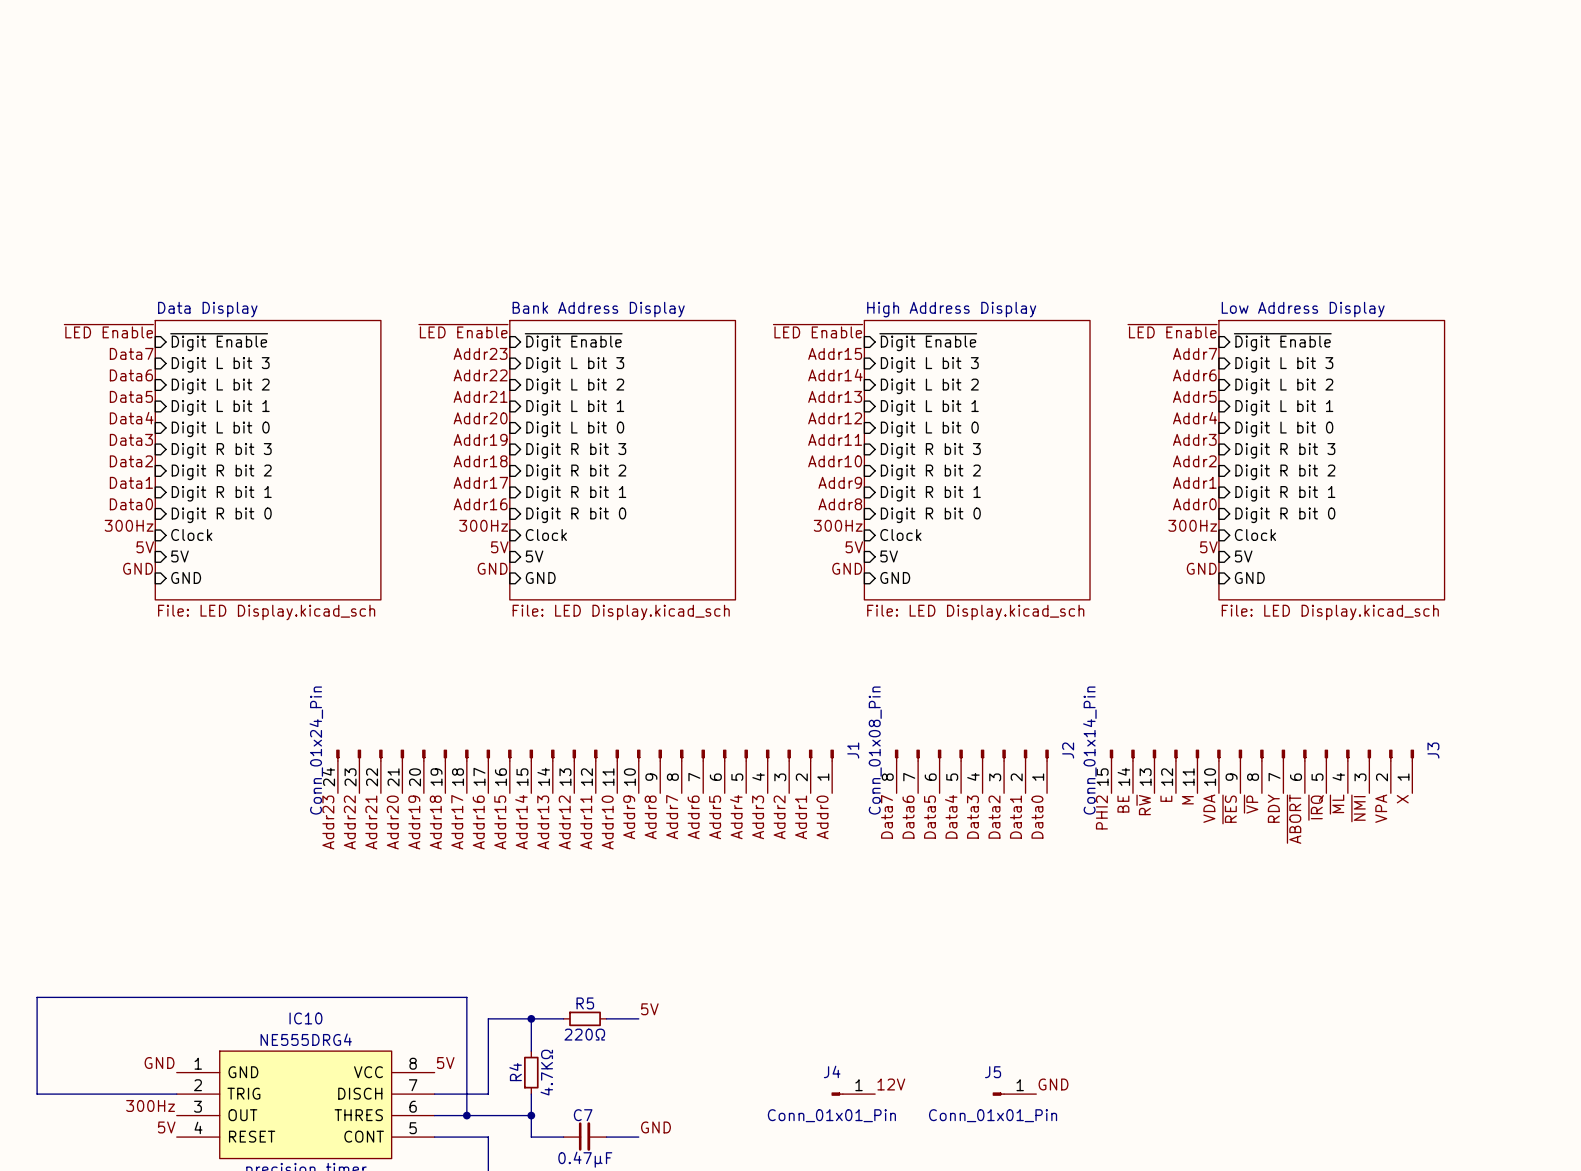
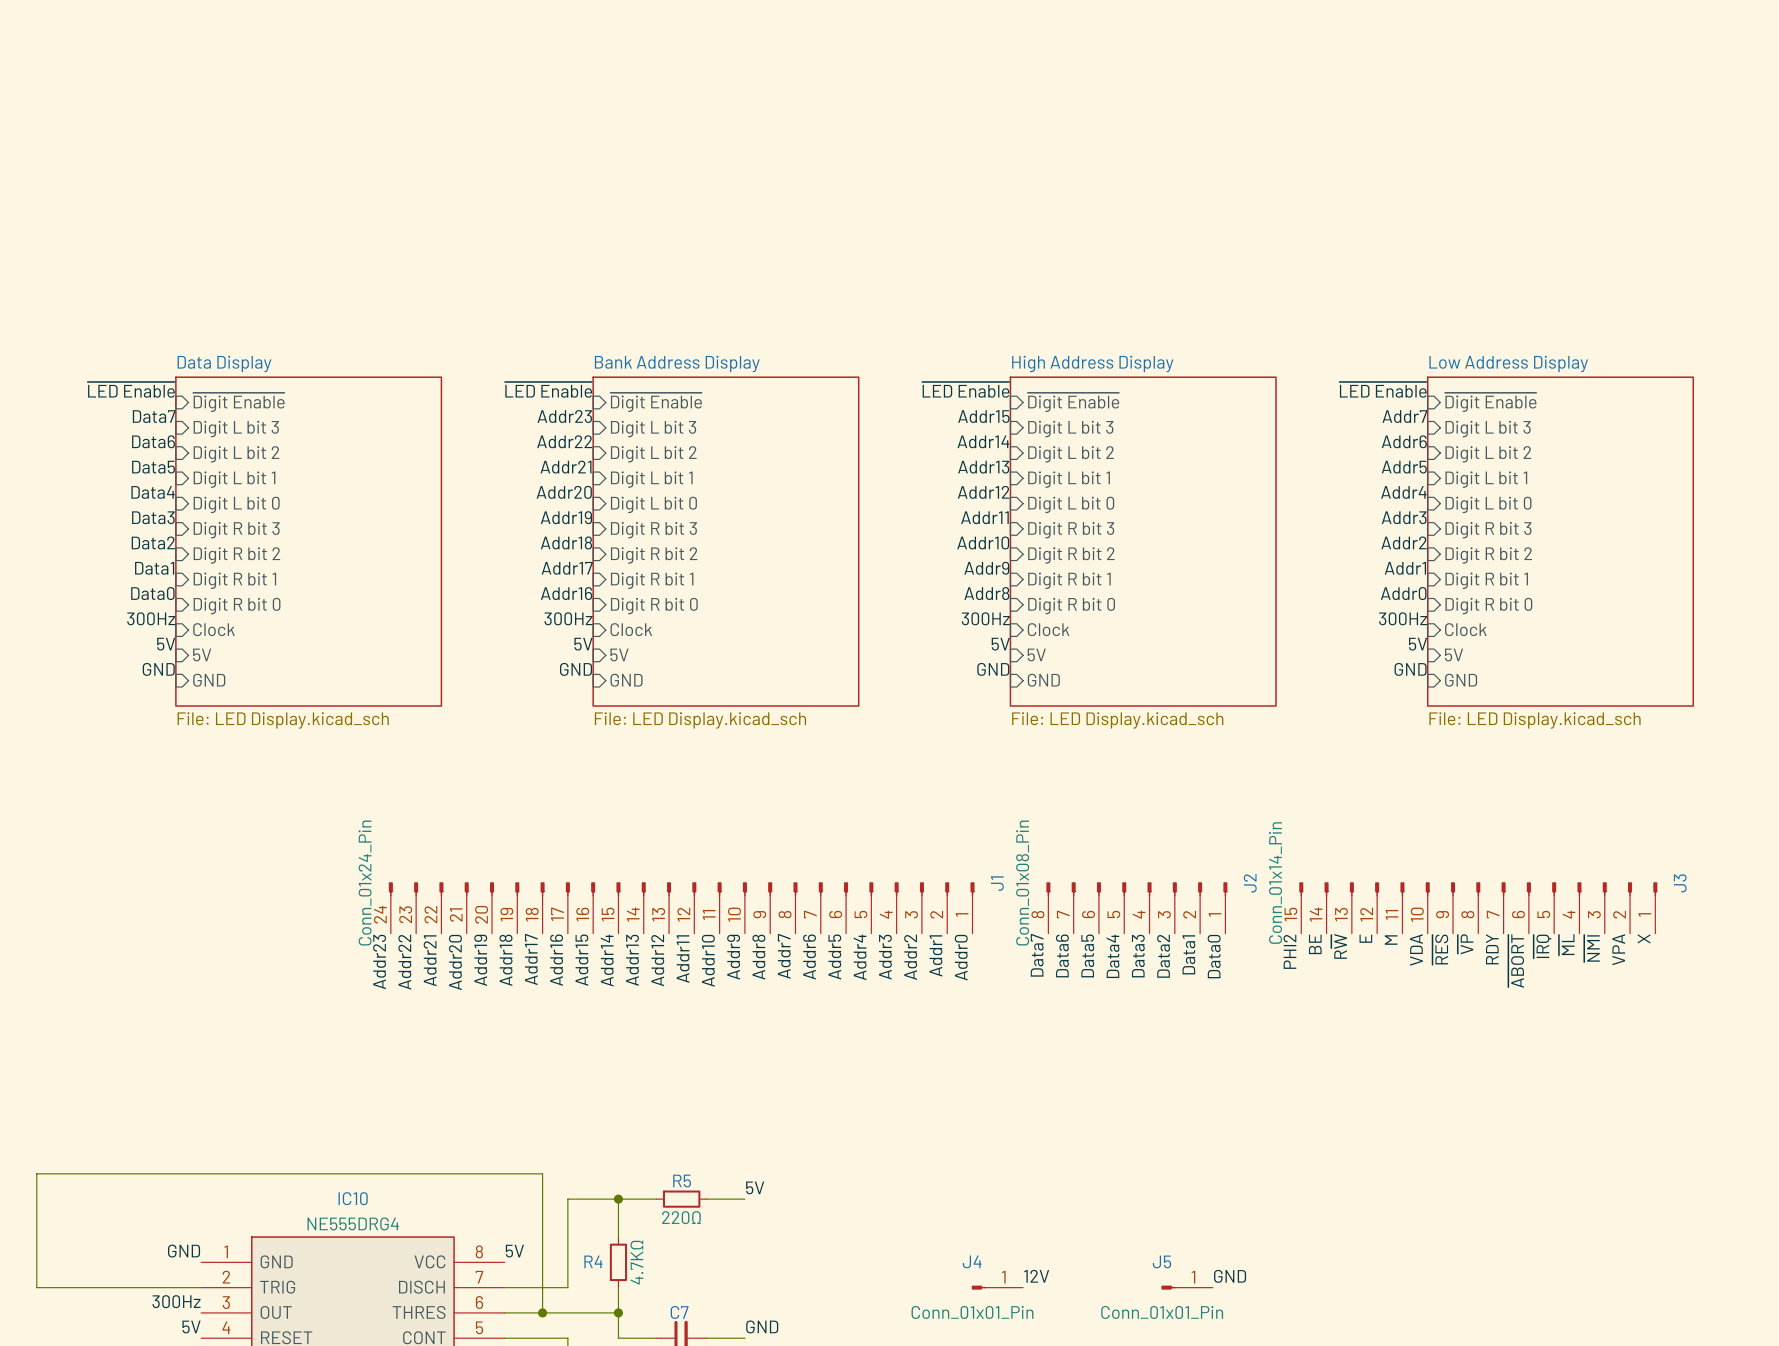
R4 name rotation: 0° (515, 1072) -> 90° clockwise (593, 1261)

